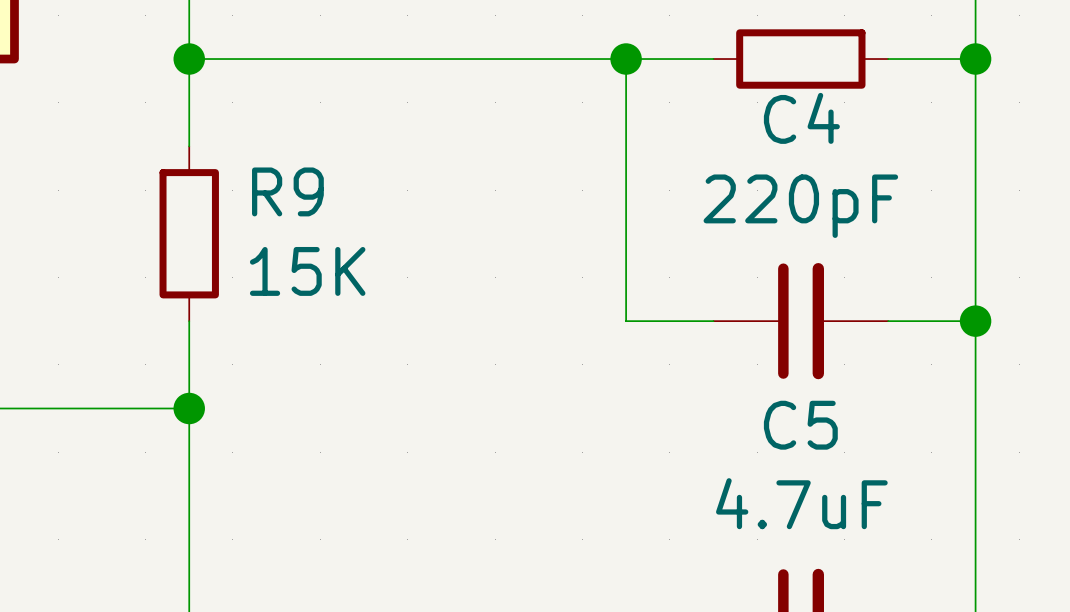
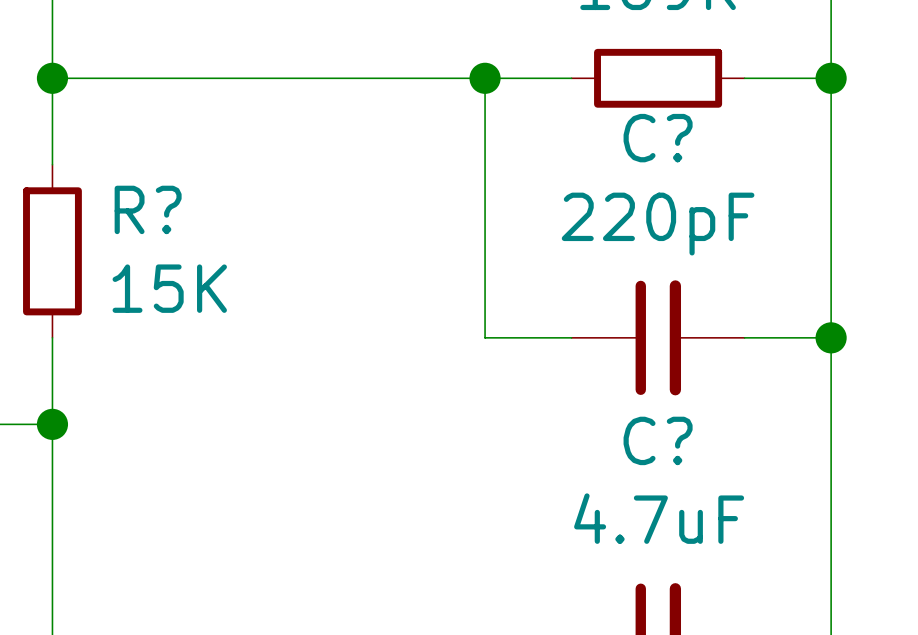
C4 name: C4 (801, 118) -> C? (658, 138)
R9 name: R9 (287, 191) -> R? (148, 209)
C5 name: C5 (800, 425) -> C? (658, 440)

